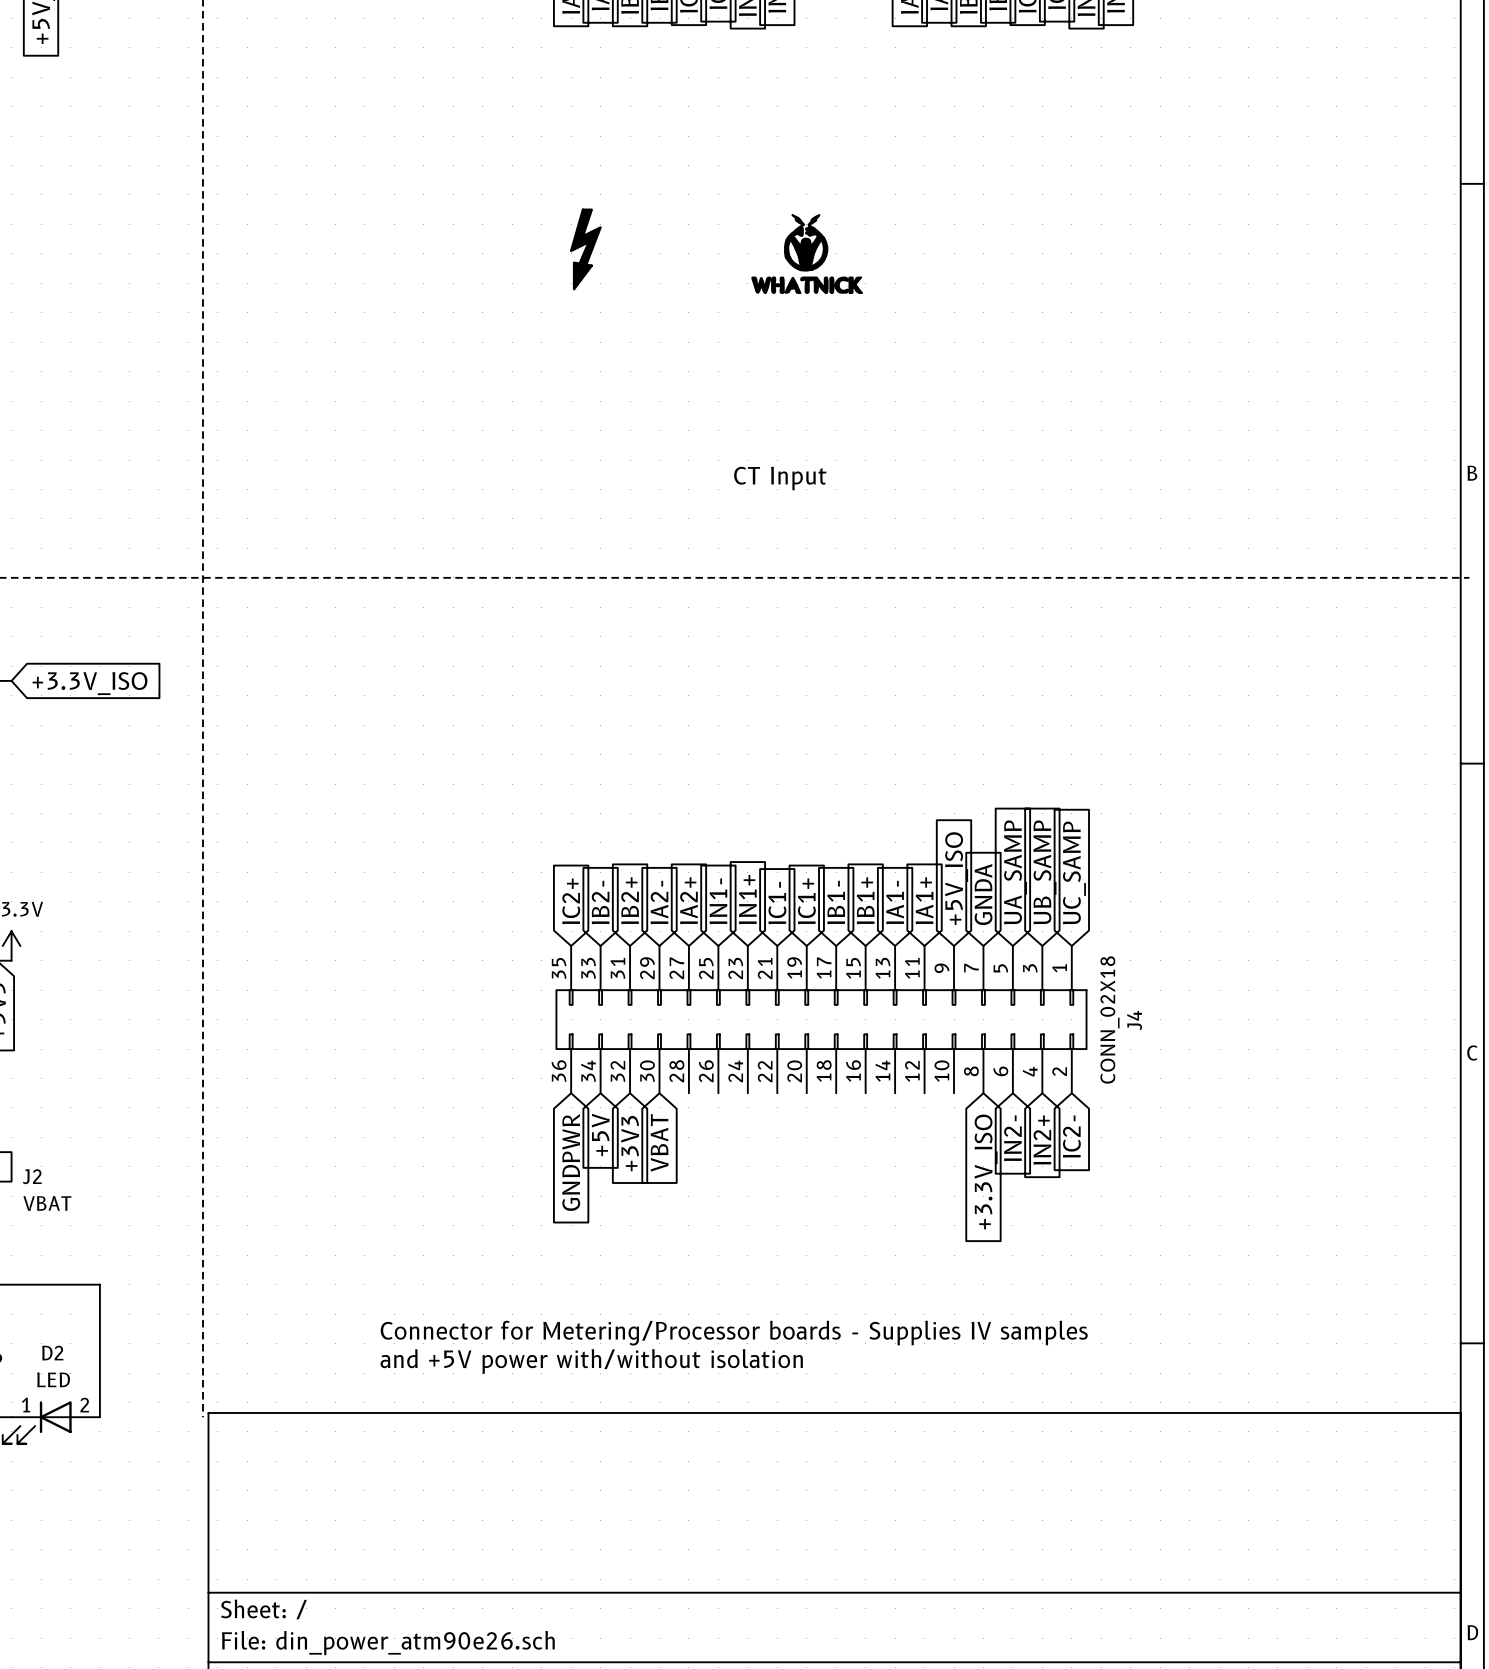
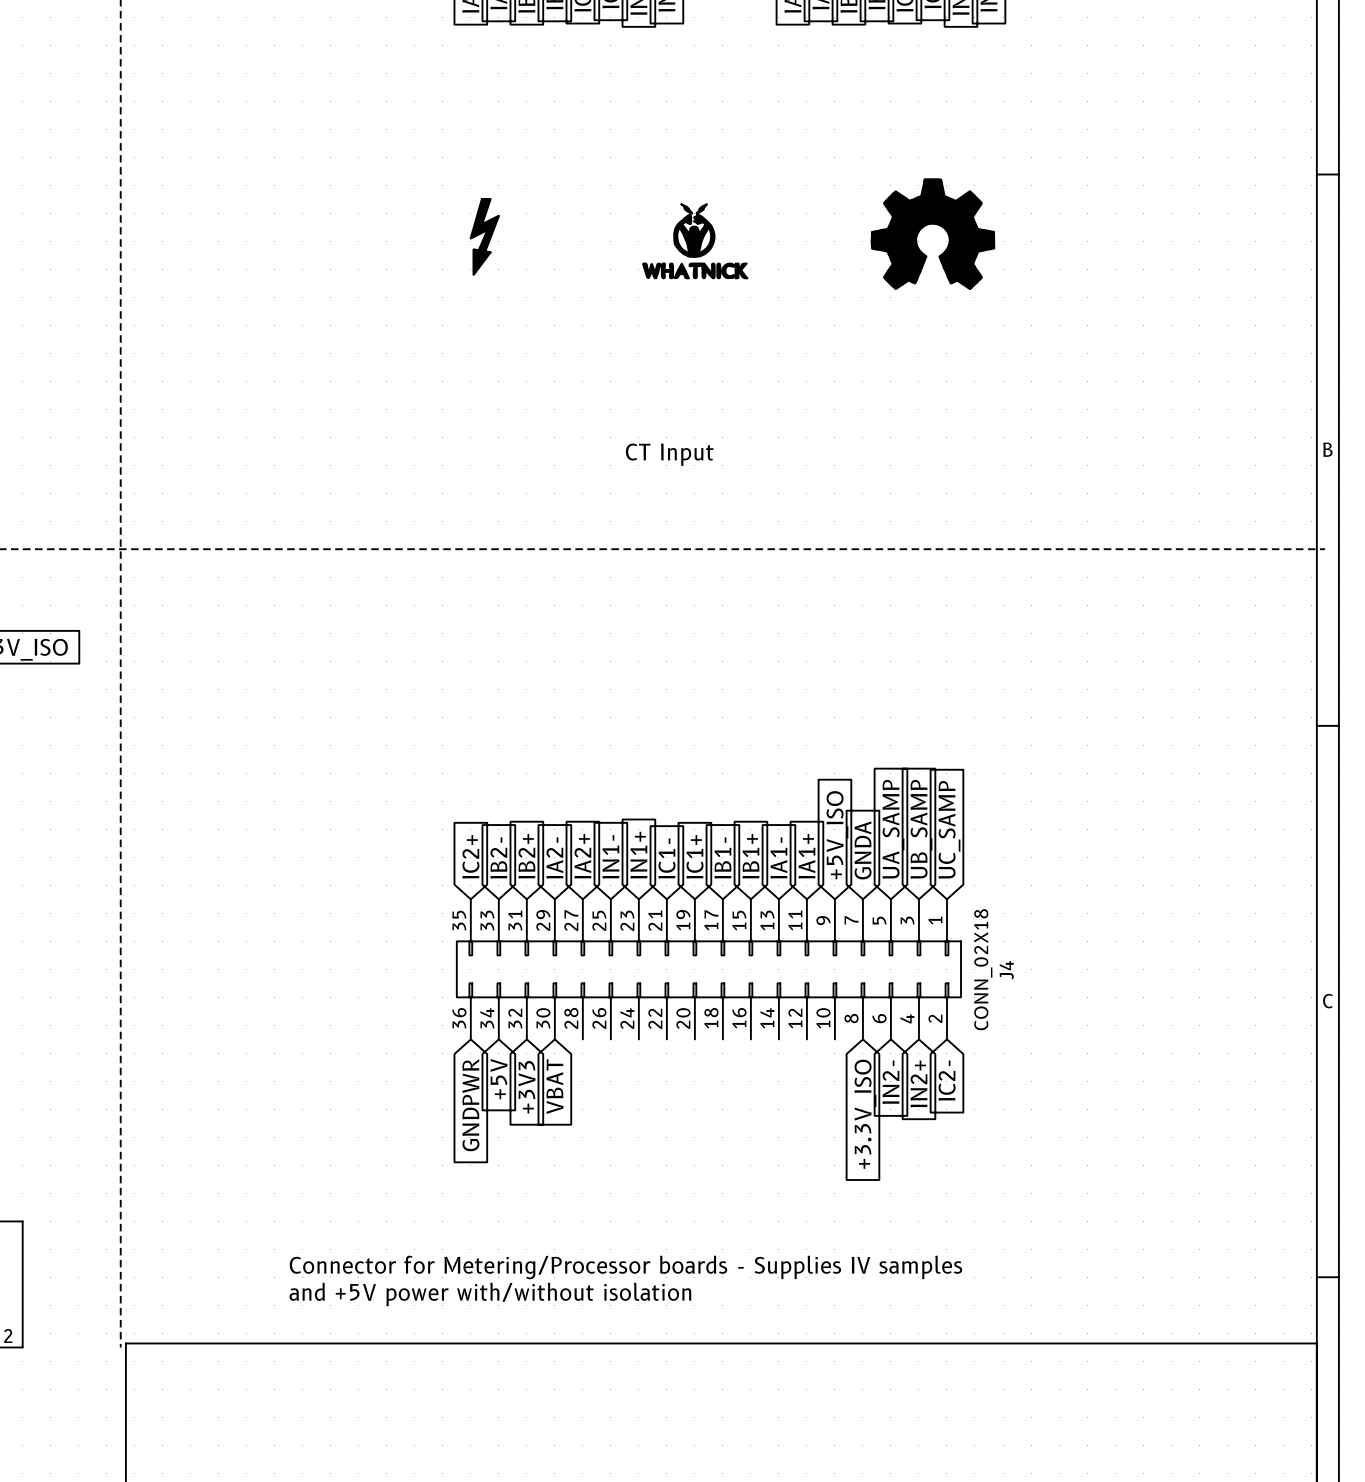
part: none -> (932, 234)

